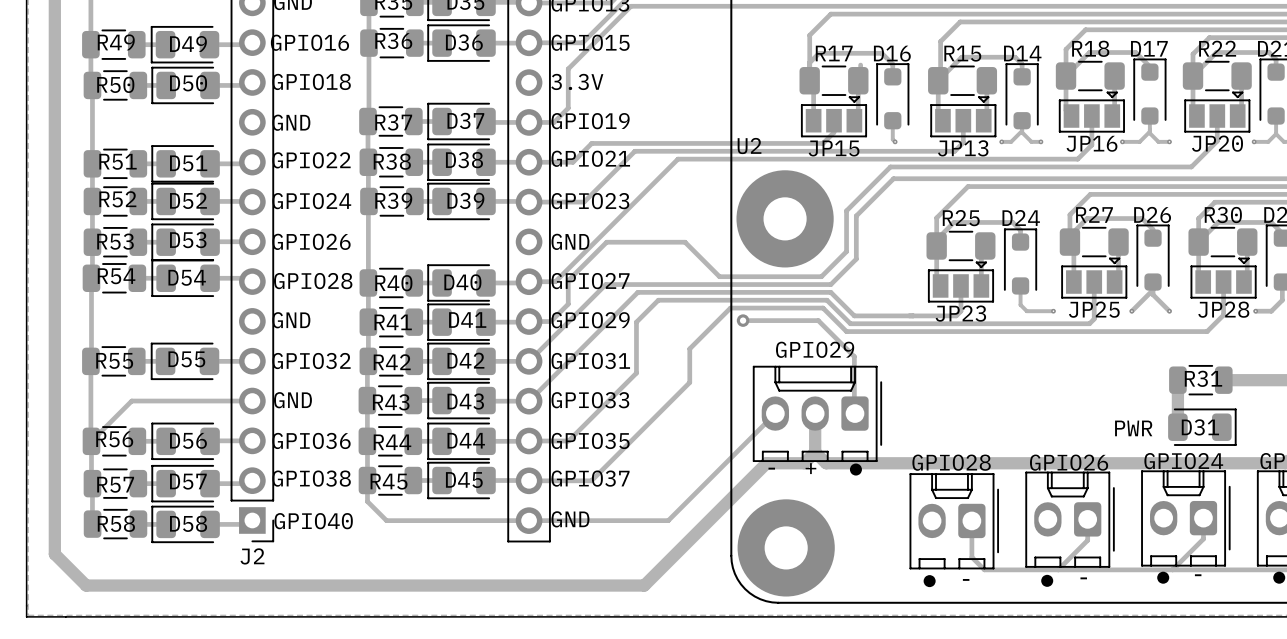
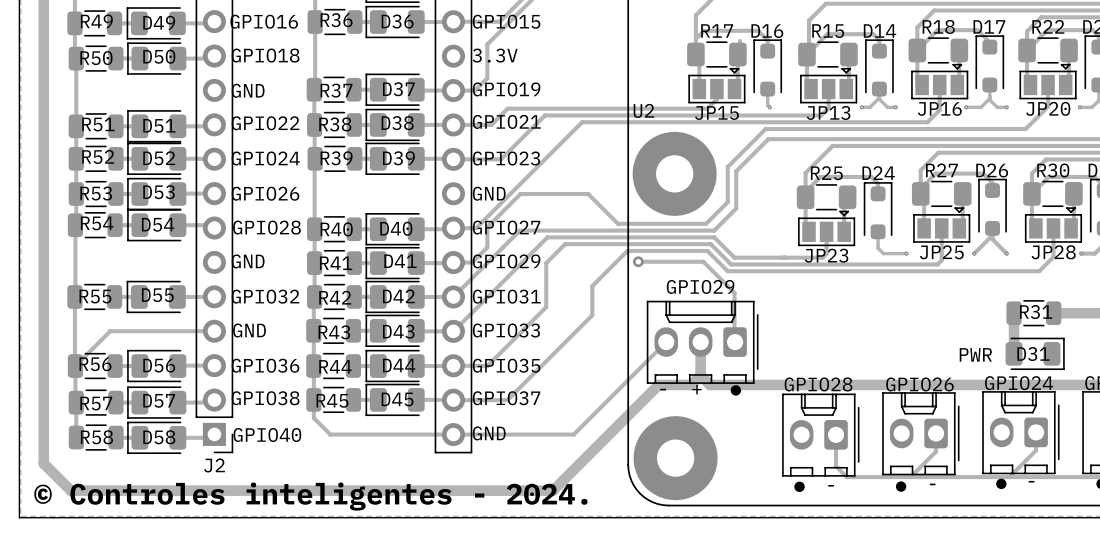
text: none -> © Controles inteligentes - 2024. (310, 496)

